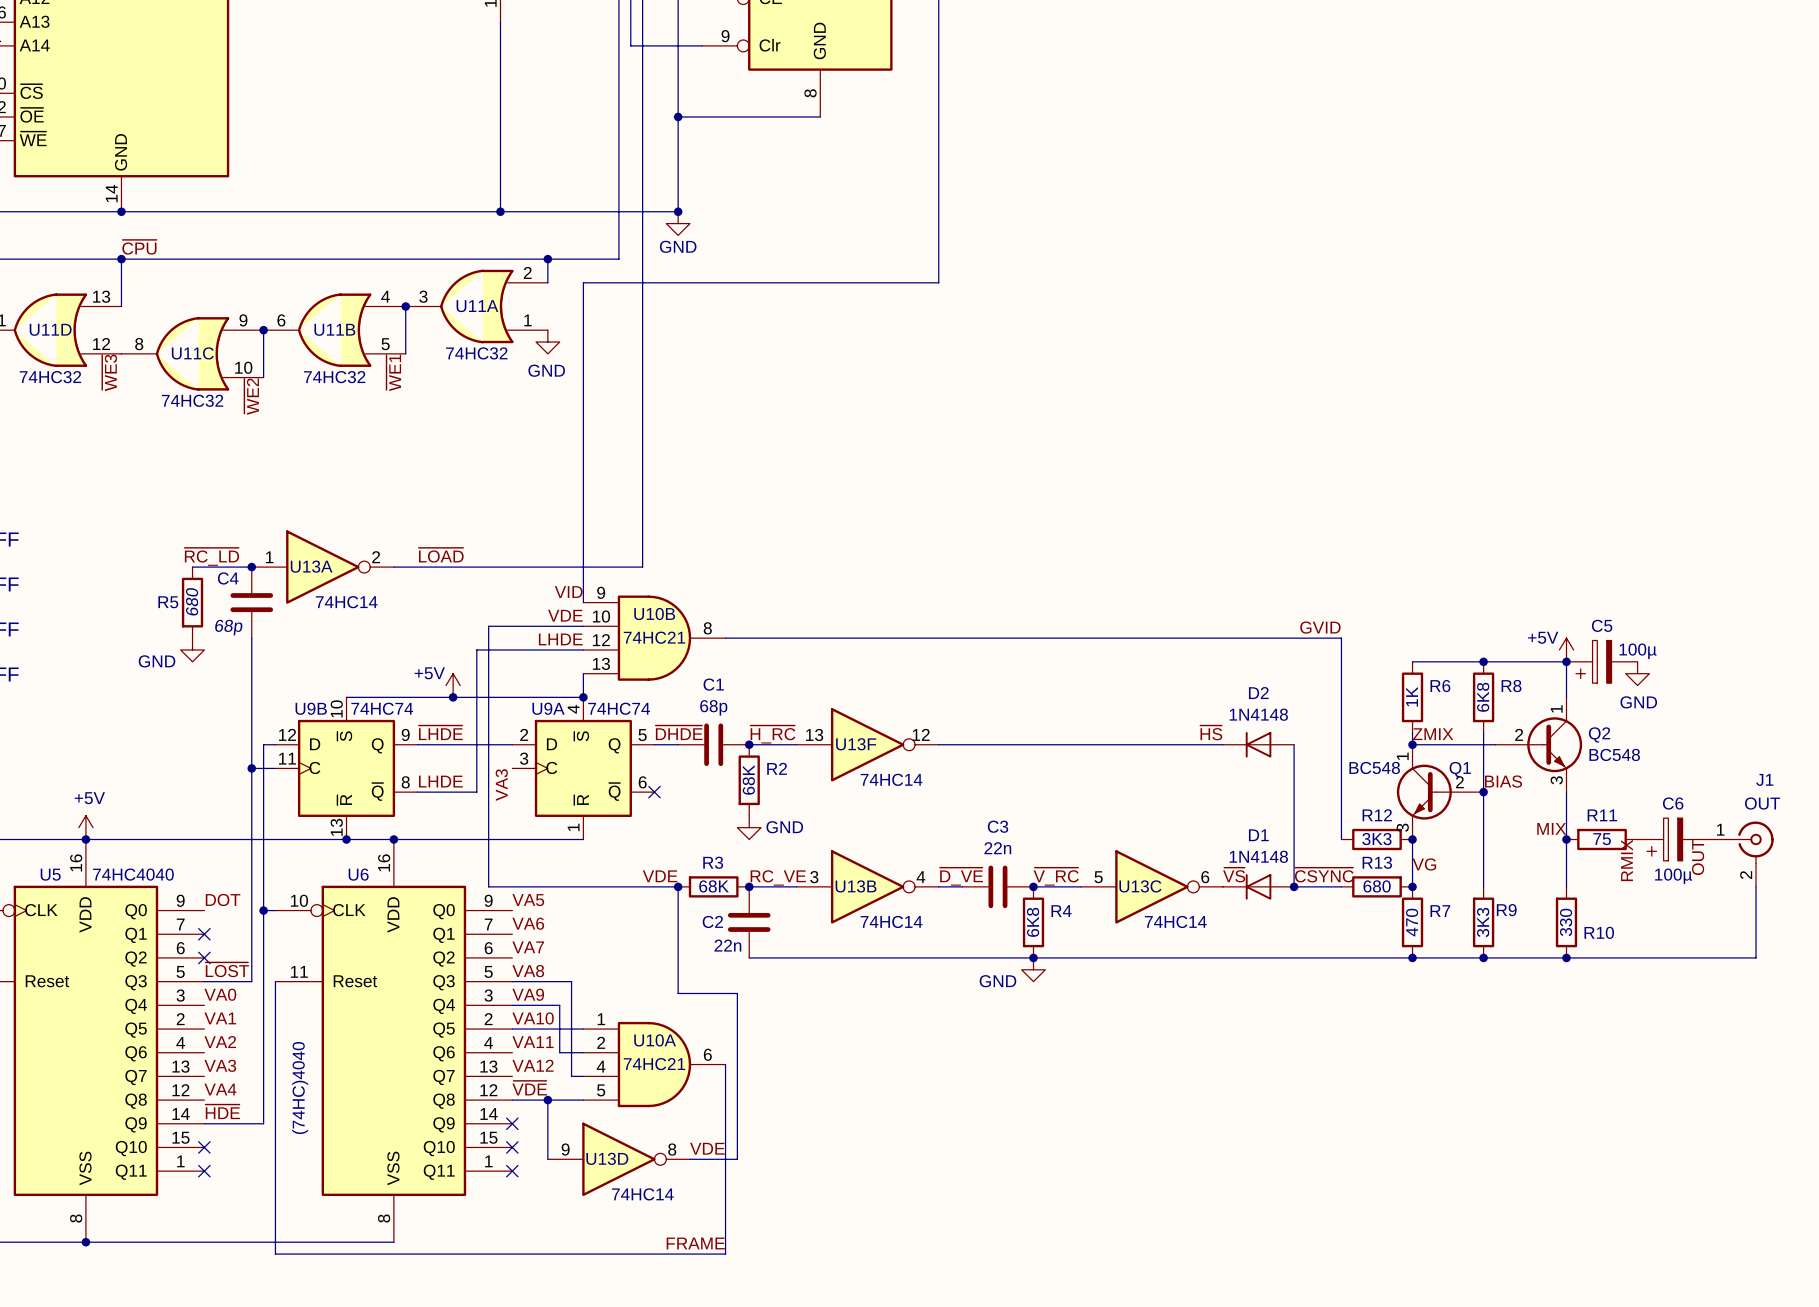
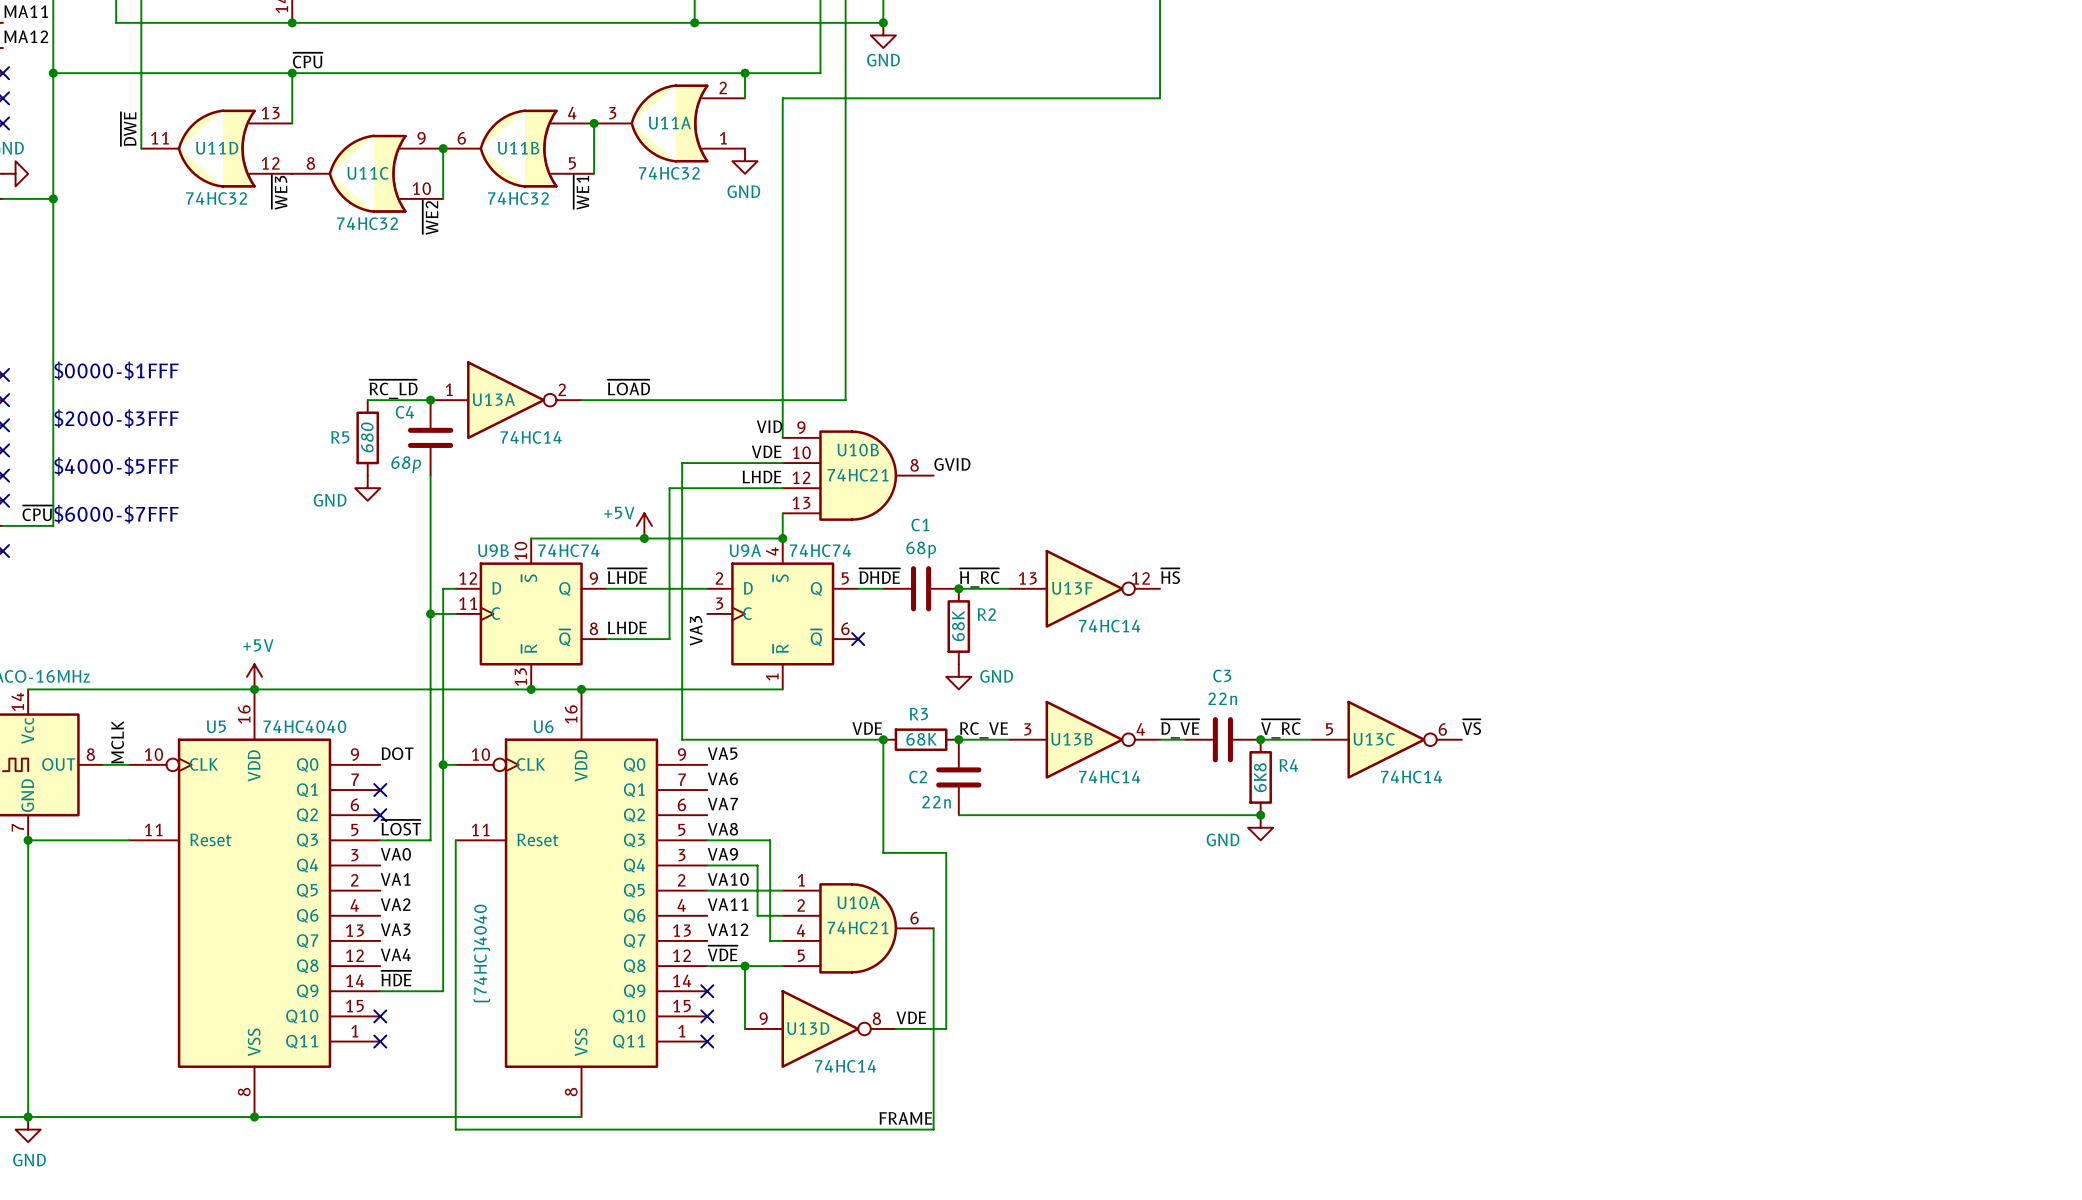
label: none -> GVID (952, 464)
label: GVID (1320, 627) -> none
wire: (725, 638) (1341, 638) (1341, 839) -> none
power symbol: +5V (1566, 649) -> none
wire: (1412, 661) (1566, 661) (1566, 697) -> none
junction: (1483, 661) -> none
junction: (1566, 661) -> none
C5: 100µ (1602, 661) -> none
power symbol: GND (1637, 673) -> none
R6: 1K (1412, 697) -> none
R8: 6K8 (1483, 697) -> none
label: none -> ~{HS} (1170, 576)
label: ~{HS} (1211, 732) -> none
wire: (1412, 732) (1412, 744) (1495, 744) -> none
wire: (1483, 732) (1483, 886) -> none
label: ZMIX (1433, 734) -> none
wire: (938, 744) (1223, 744) -> none
D2: 1N4148 (1258, 744) -> none
wire: (1294, 744) (1294, 886) (1341, 886) -> none
junction: (1412, 744) -> none
Q2: BC548 (1538, 744) -> none
label: BIAS (1503, 781) -> none
Q1: BC548 (1440, 792) -> none
junction: (1483, 792) -> none
wire: (1566, 792) (1566, 886) -> none
label: MIX (1551, 828) -> none
R12: 3K3 (1376, 839) -> none
wire: (1412, 839) (1412, 886) -> none
junction: (1412, 839) -> none
junction: (1566, 839) -> none
R11: 75 (1602, 839) -> none
C6: 100µ (1673, 839) -> none
J1: OUT (1741, 854) -> none
label: OUT (1698, 857) -> none
label: RMIX (1627, 860) -> none
label: VG (1424, 864) -> none
label: ~{CSYNC} (1324, 875) -> none
D1: 1N4148 (1258, 886) -> none
junction: (1294, 886) -> none
R13: 680 (1376, 886) -> none
junction: (1412, 886) -> none
wire: (1756, 886) (1756, 957) (1033, 957) -> none
R7: 470 (1412, 922) -> none
R9: 3K3 (1483, 922) -> none
R10: 330 (1566, 922) -> none
junction: (1412, 957) -> none
junction: (1483, 957) -> none
junction: (1566, 957) -> none

